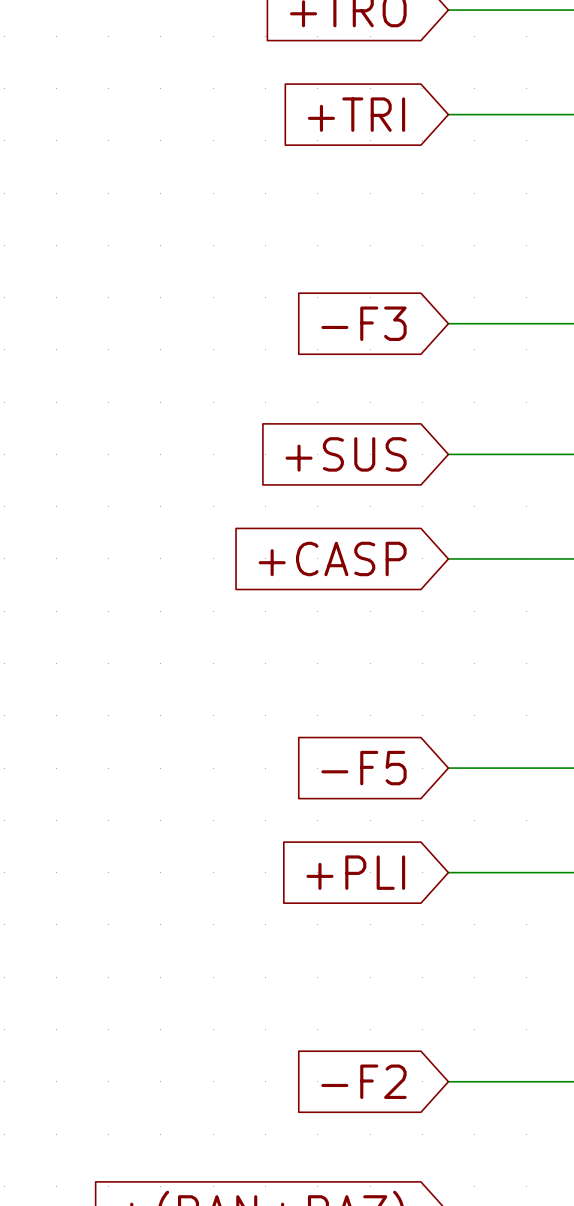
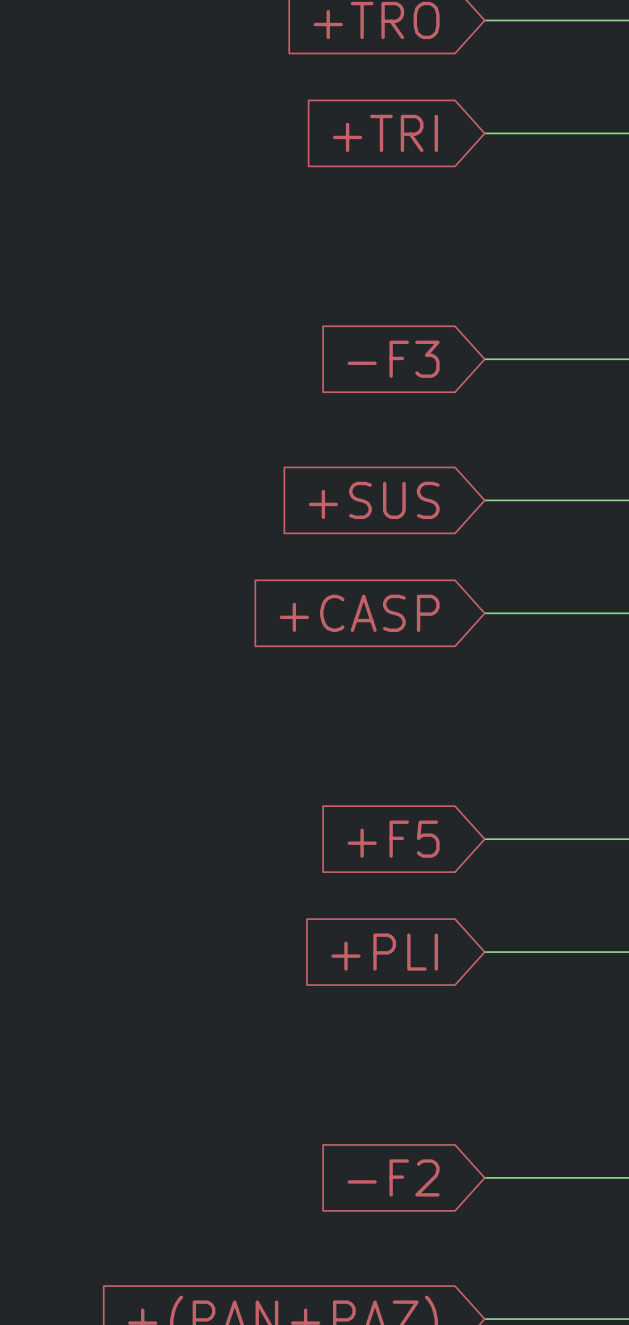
global label: -F5 (364, 768) -> +F5 (393, 839)

